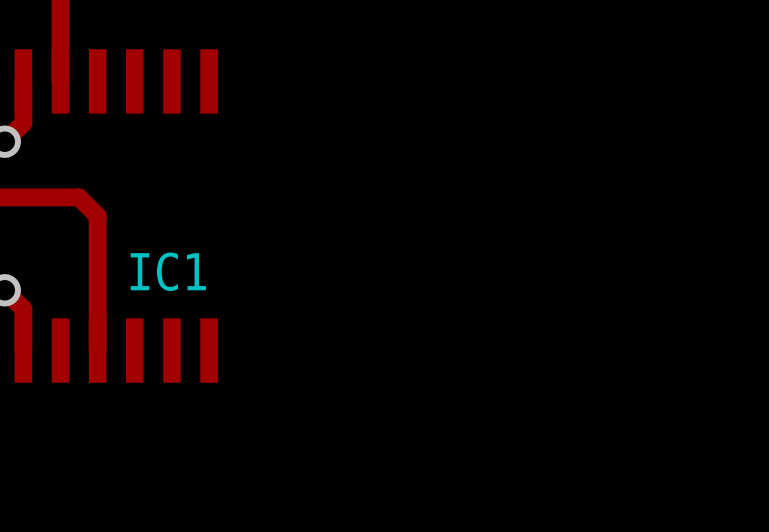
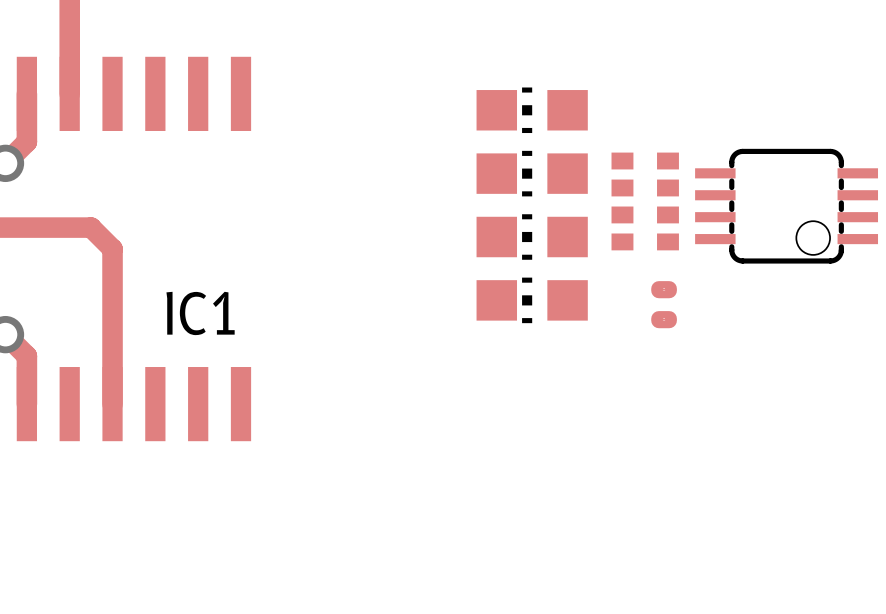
part: none -> (532, 110)
part: none -> (532, 173)
part: none -> (645, 201)
part: none -> (786, 206)
part: none -> (532, 237)
part: none -> (532, 300)
part: none -> (664, 304)

